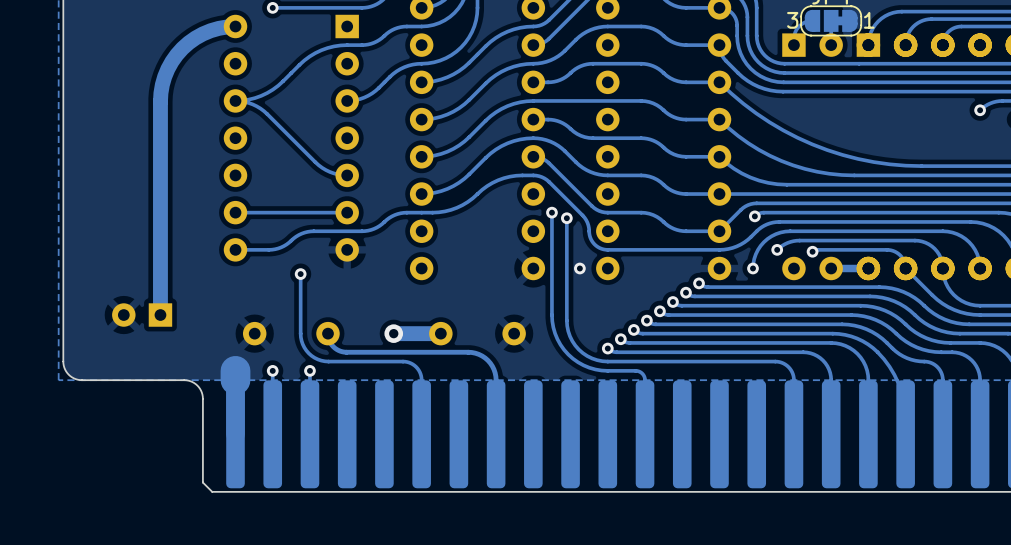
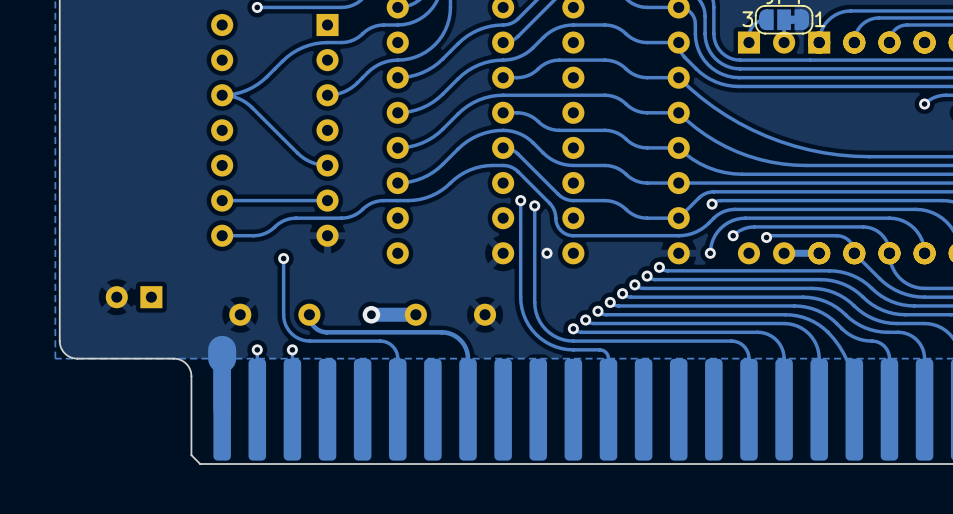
track: (235, 26) (210, 30) (188, 42) (171, 61) (162, 84) (160, 101) (160, 315) -> none

